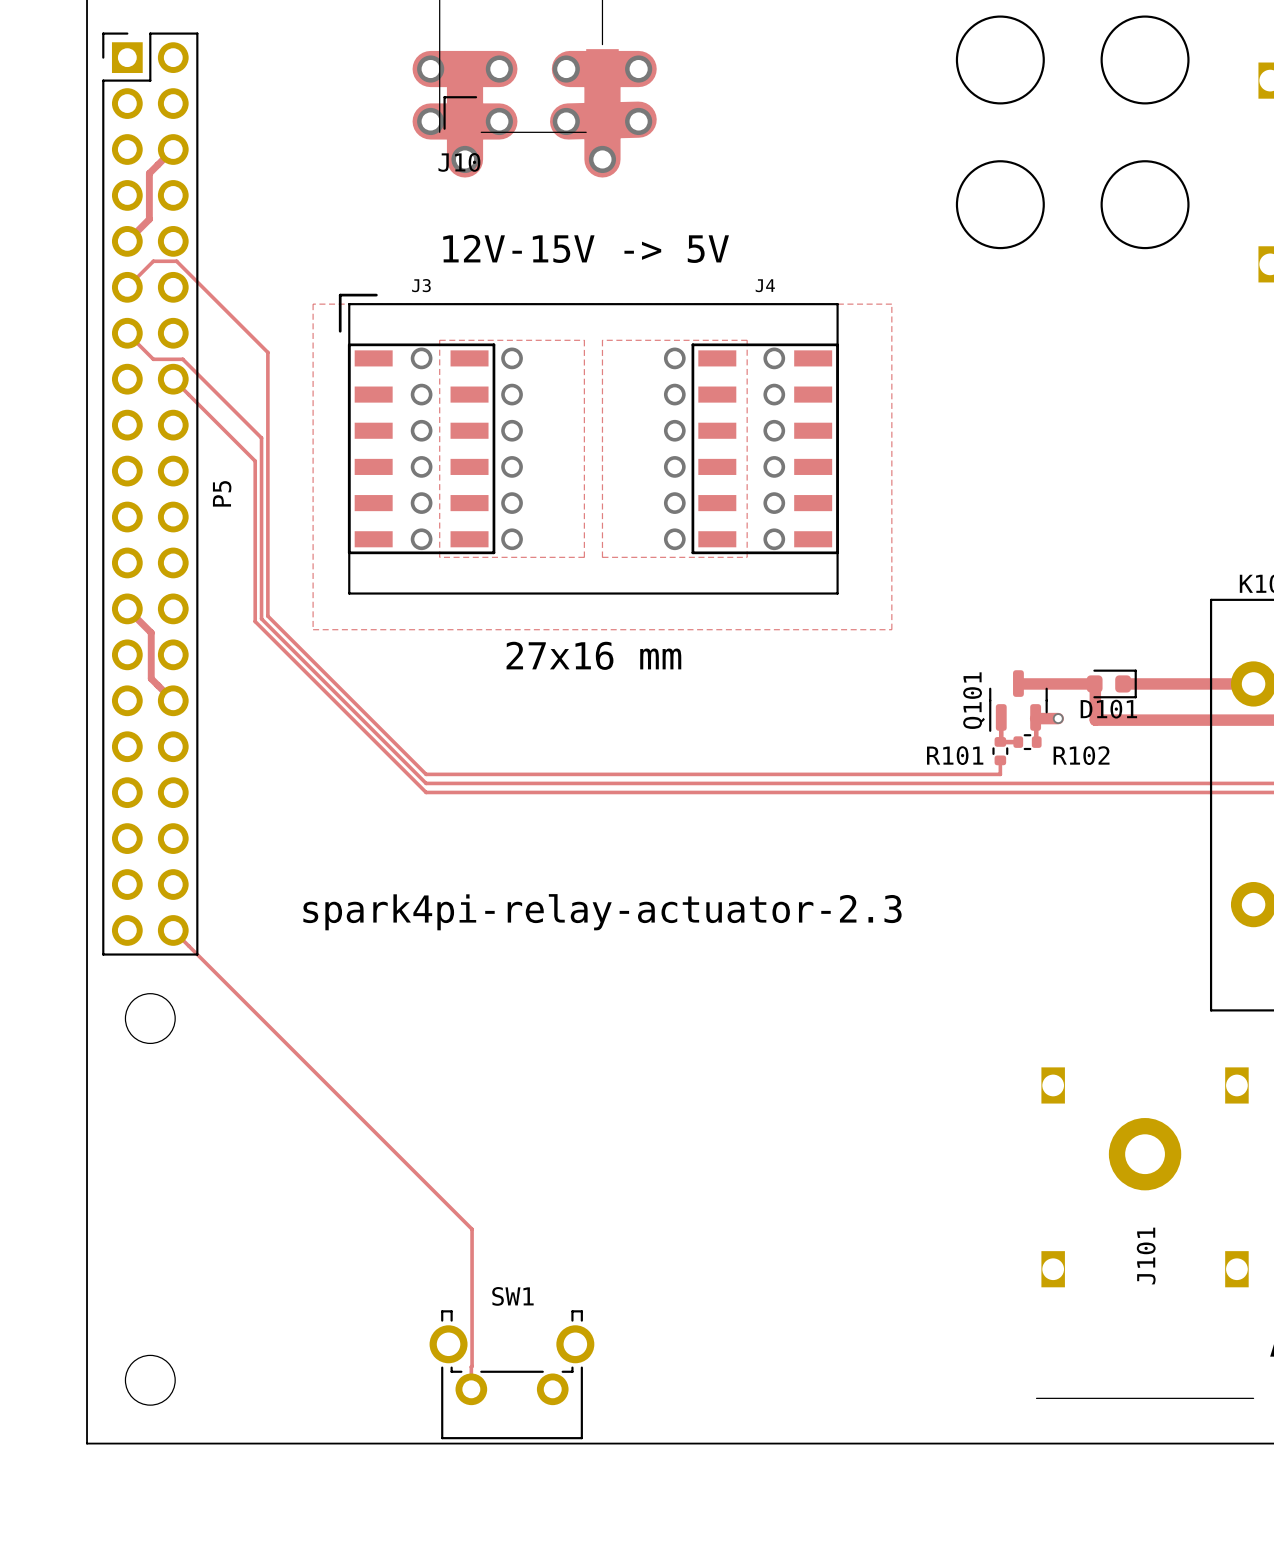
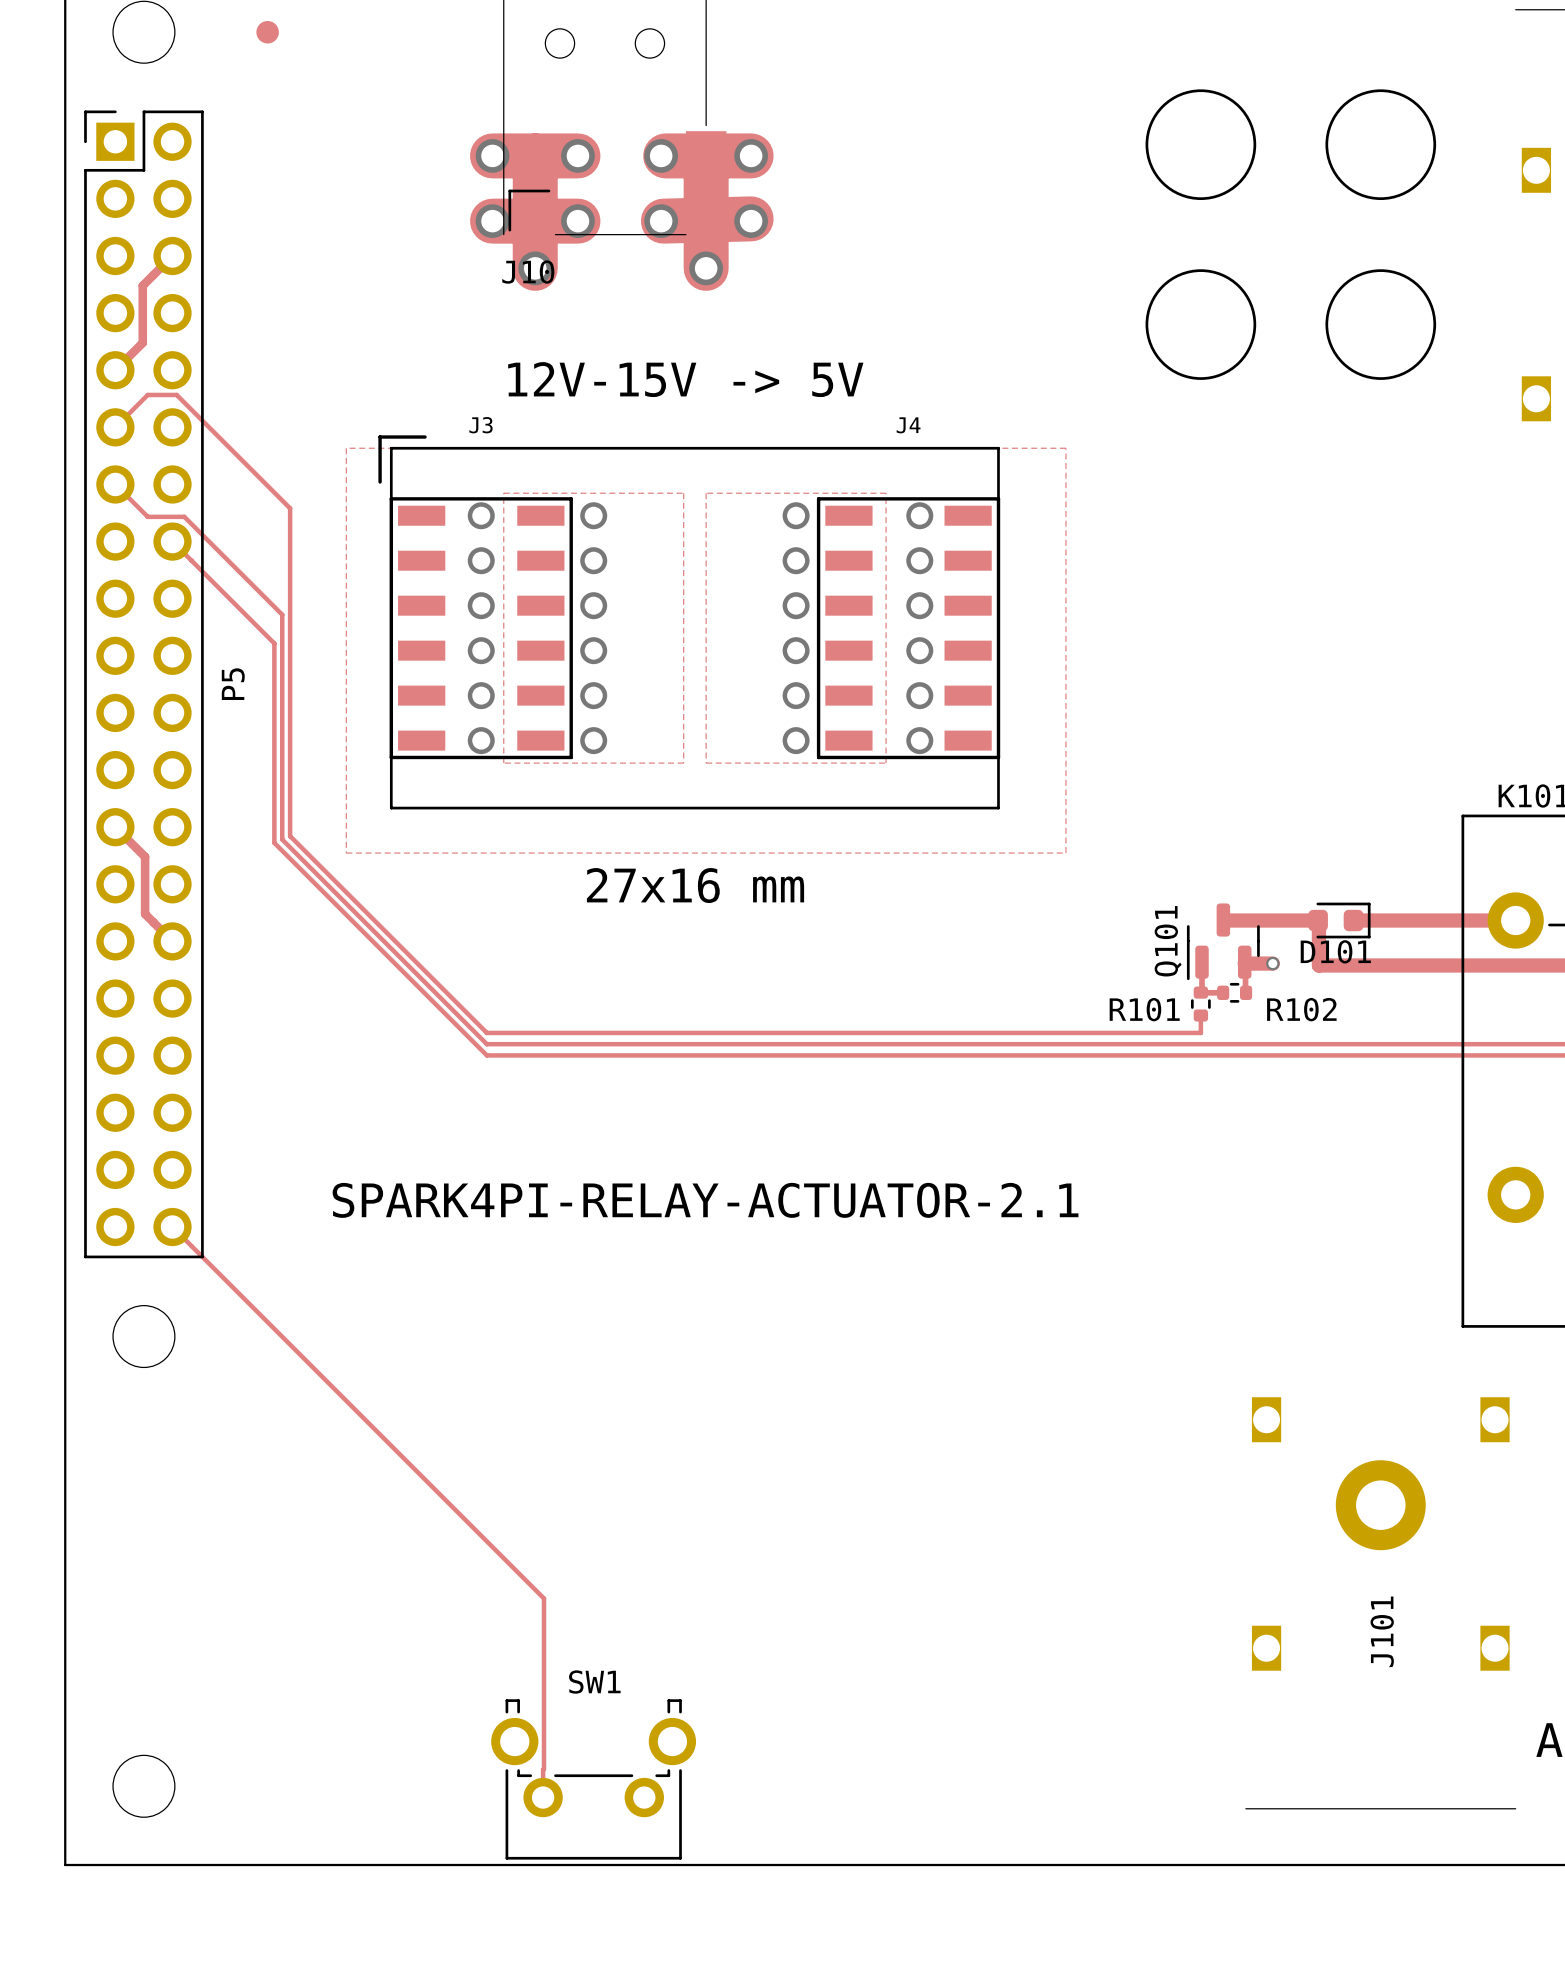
text: spark4pi-relay-actuator-2.3 (602, 912) -> SPARK4PI-RELAY-ACTUATOR-2.1 (705, 1200)

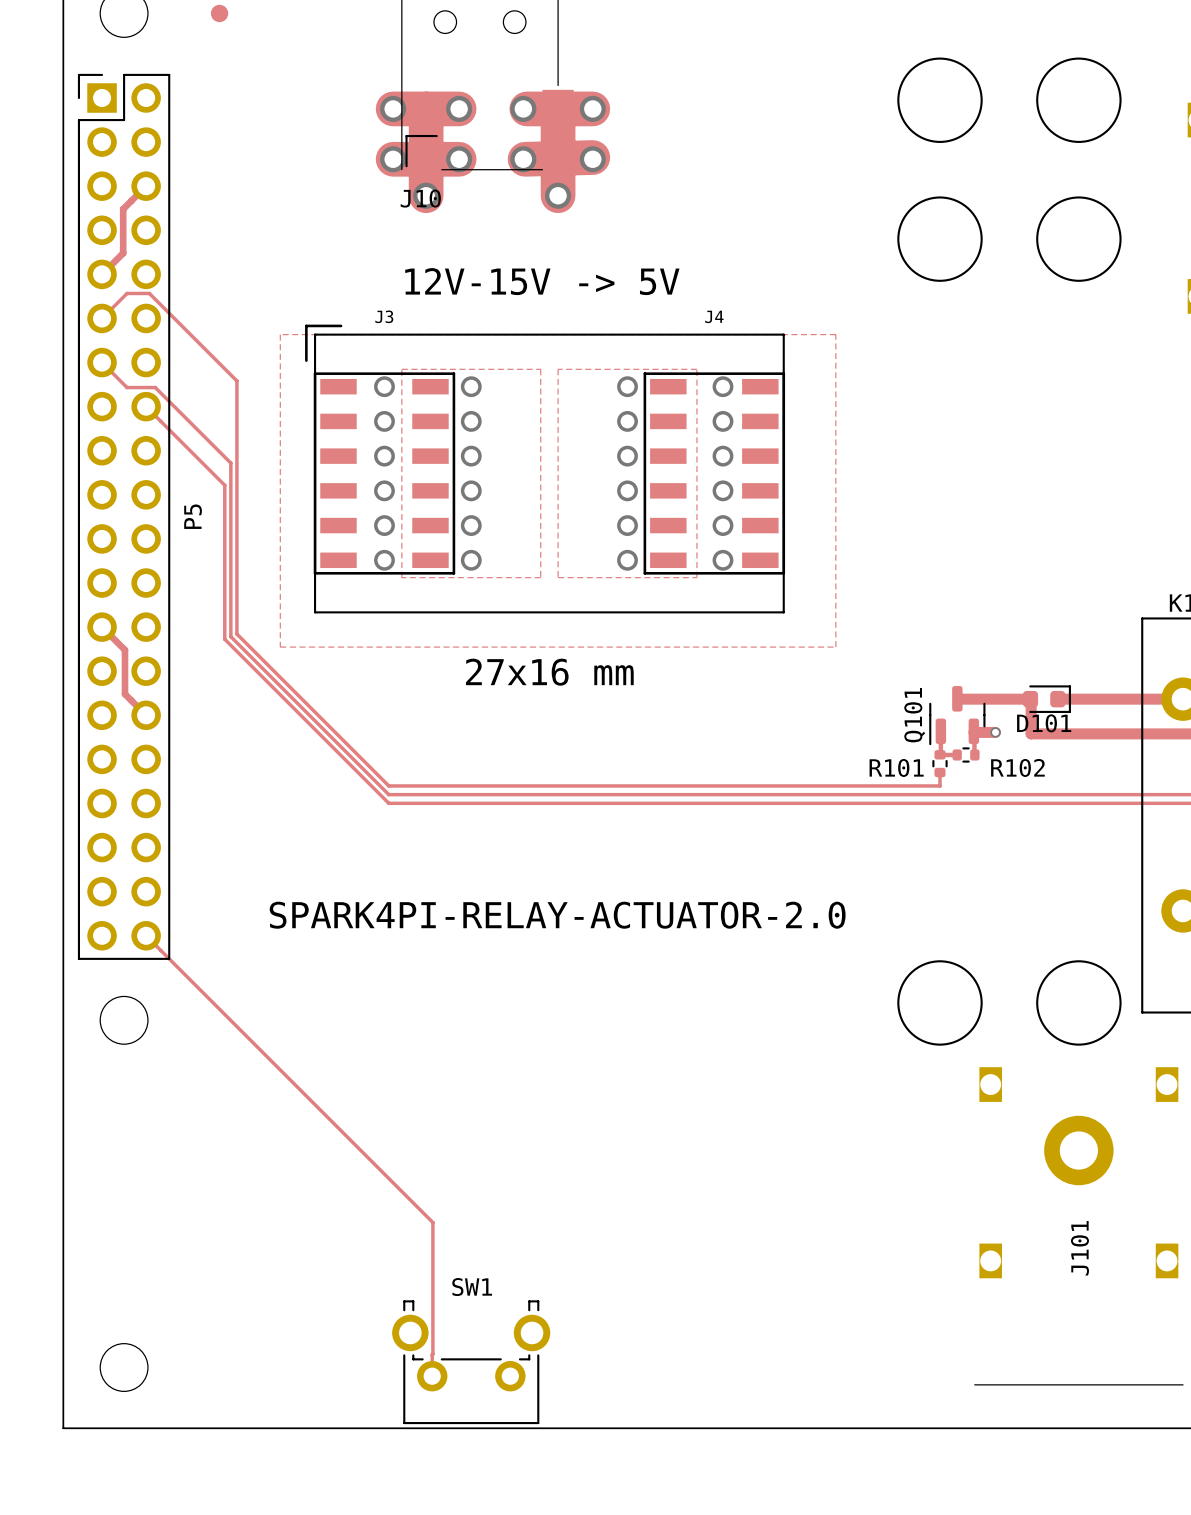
text: SPARK4PI-RELAY-ACTUATOR-2.1 (705, 1200) -> SPARK4PI-RELAY-ACTUATOR-2.0 (557, 915)
drawing: none -> [897, 960, 983, 1046]
drawing: none -> [1036, 960, 1122, 1046]

